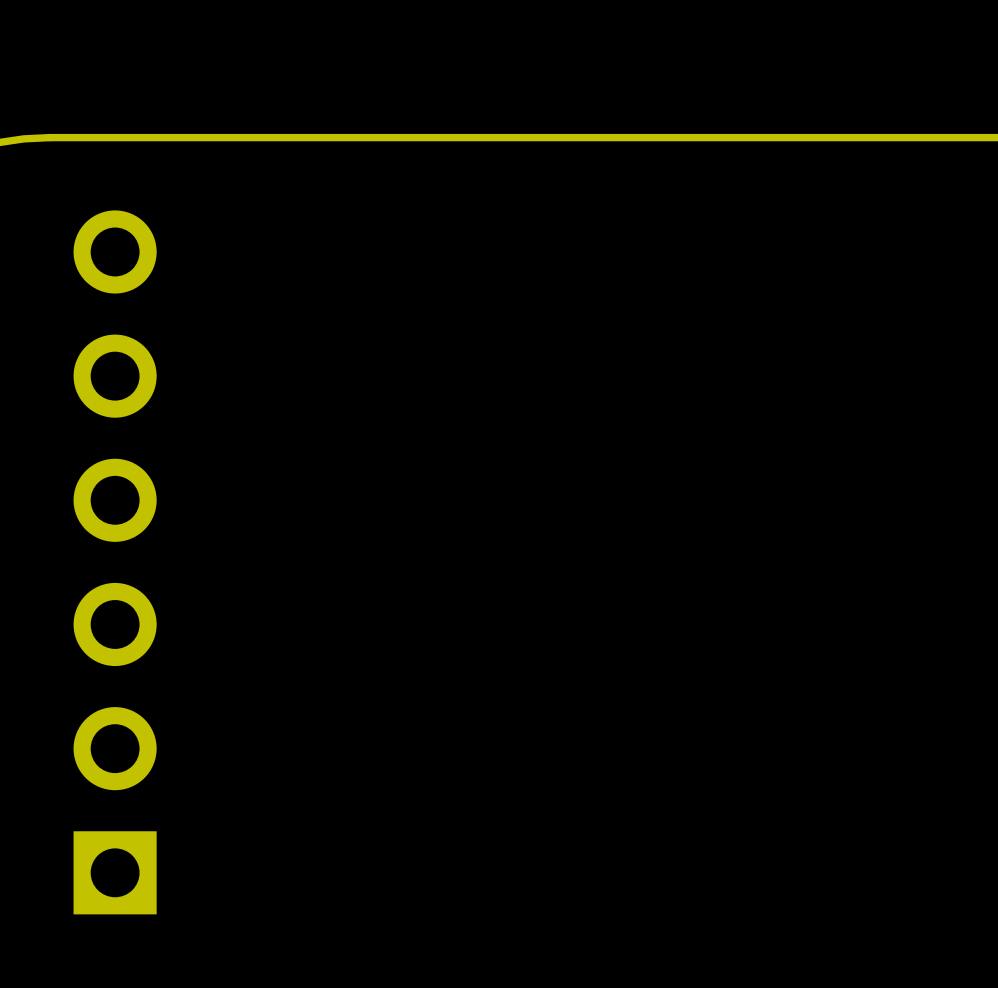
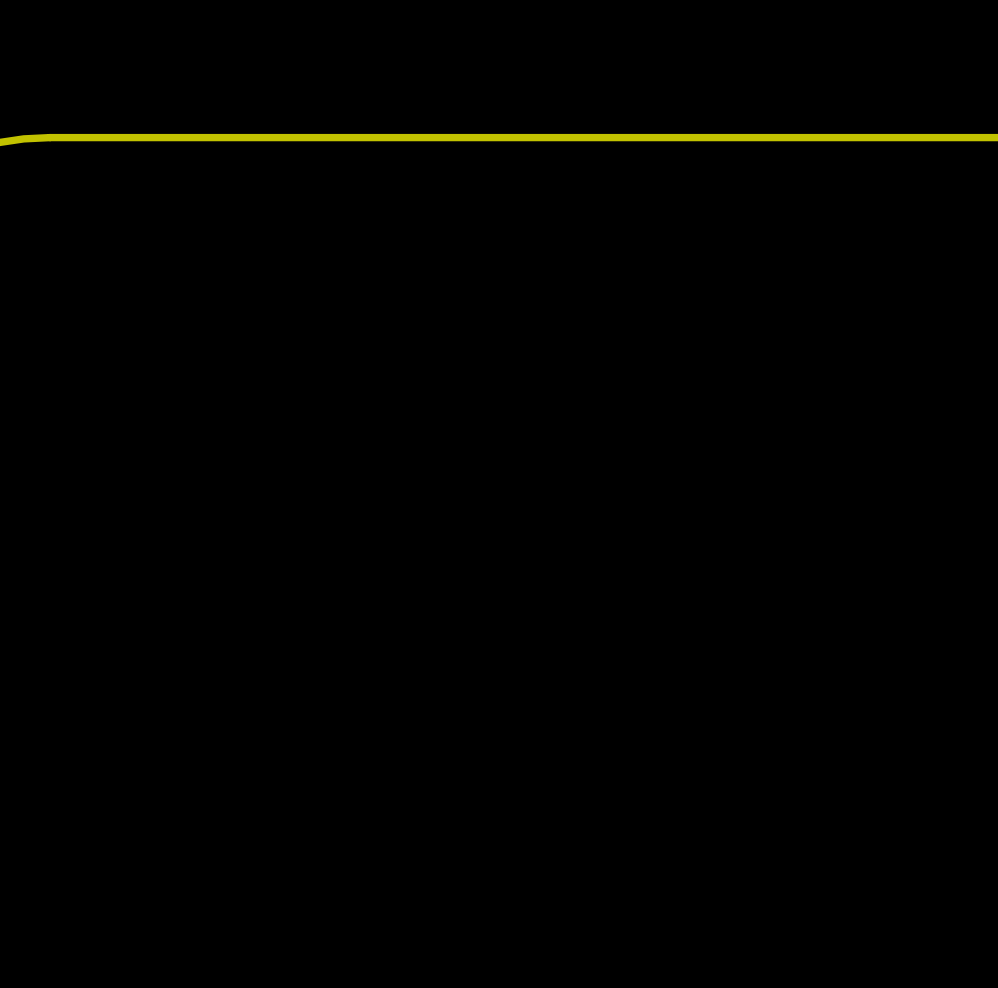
part: (115, 562) -> none

